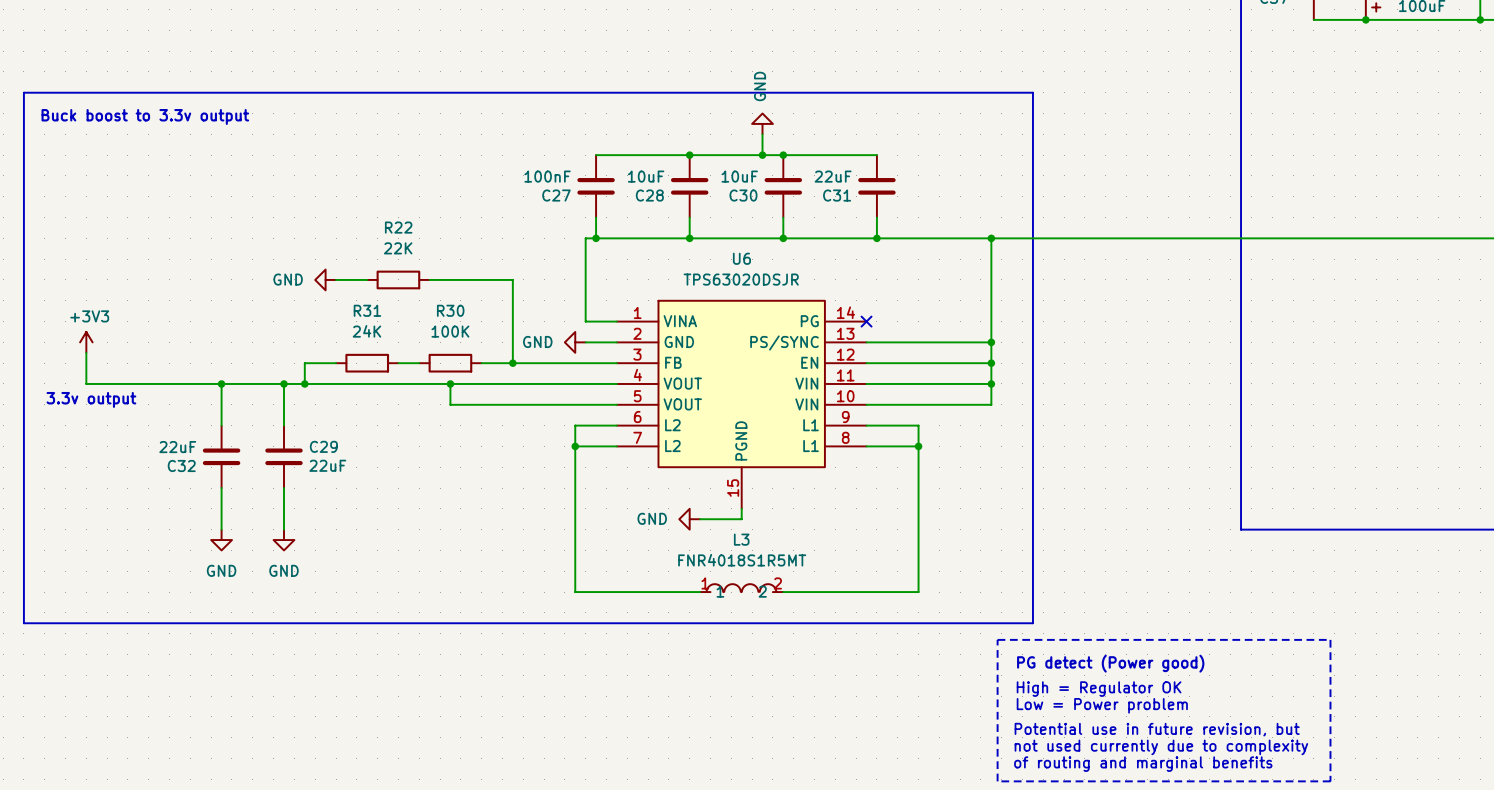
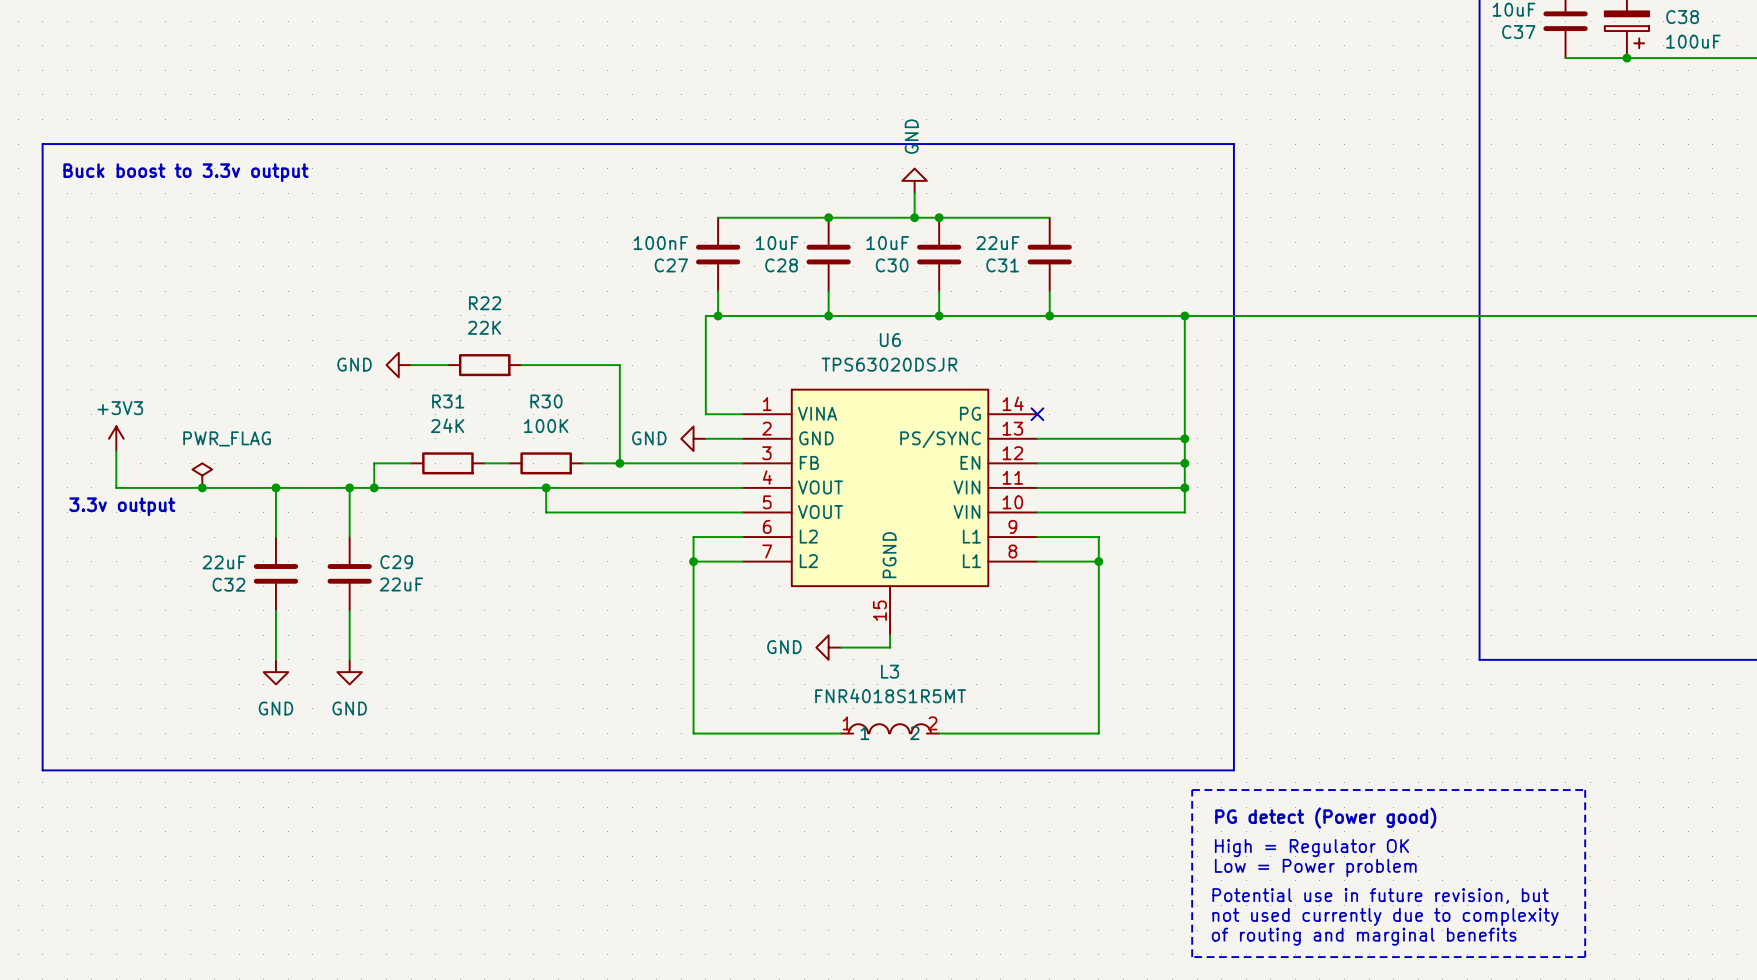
power symbol: none -> PWR_FLAG (202, 475)
junction: none -> (202, 487)

